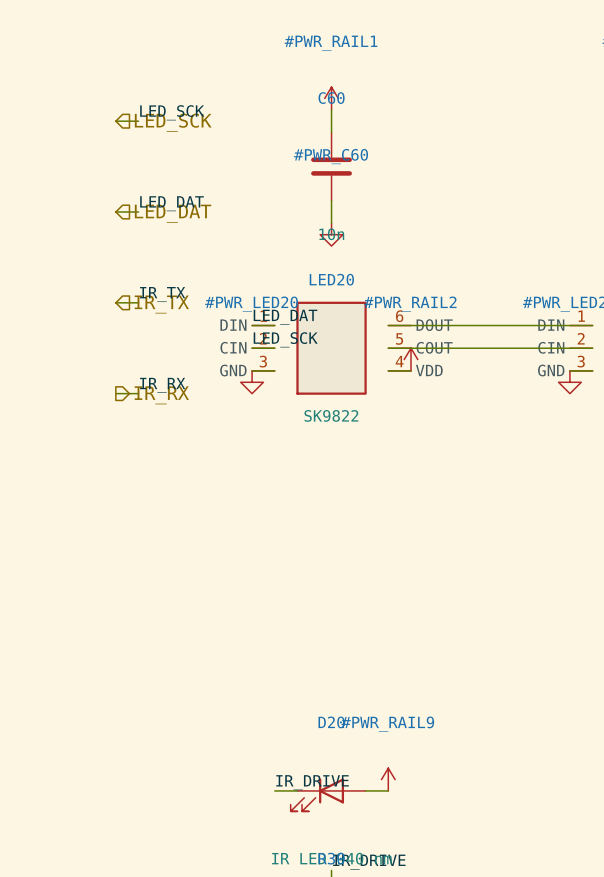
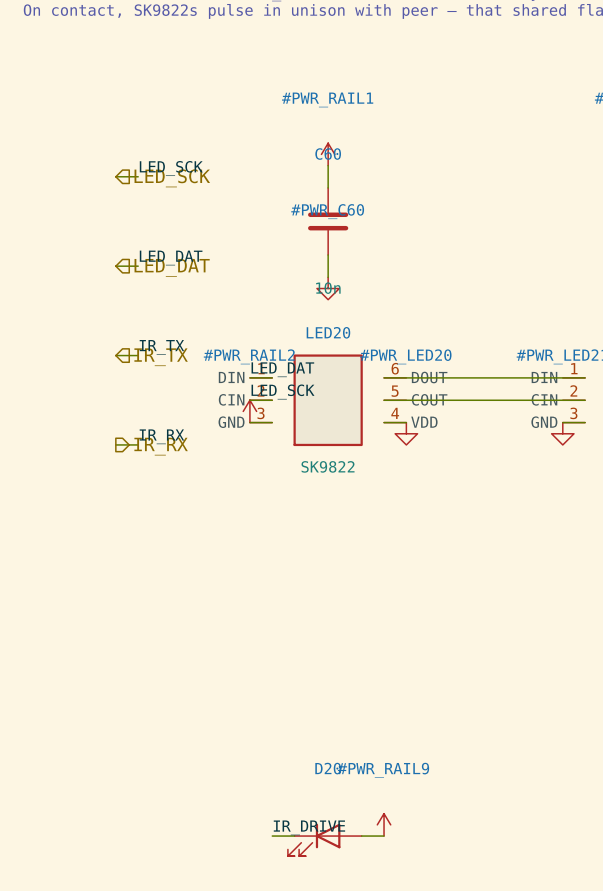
#PWR_RAIL2 position: (411, 359) -> (249, 411)
#PWR_LED20 position: (252, 382) -> (406, 433)

